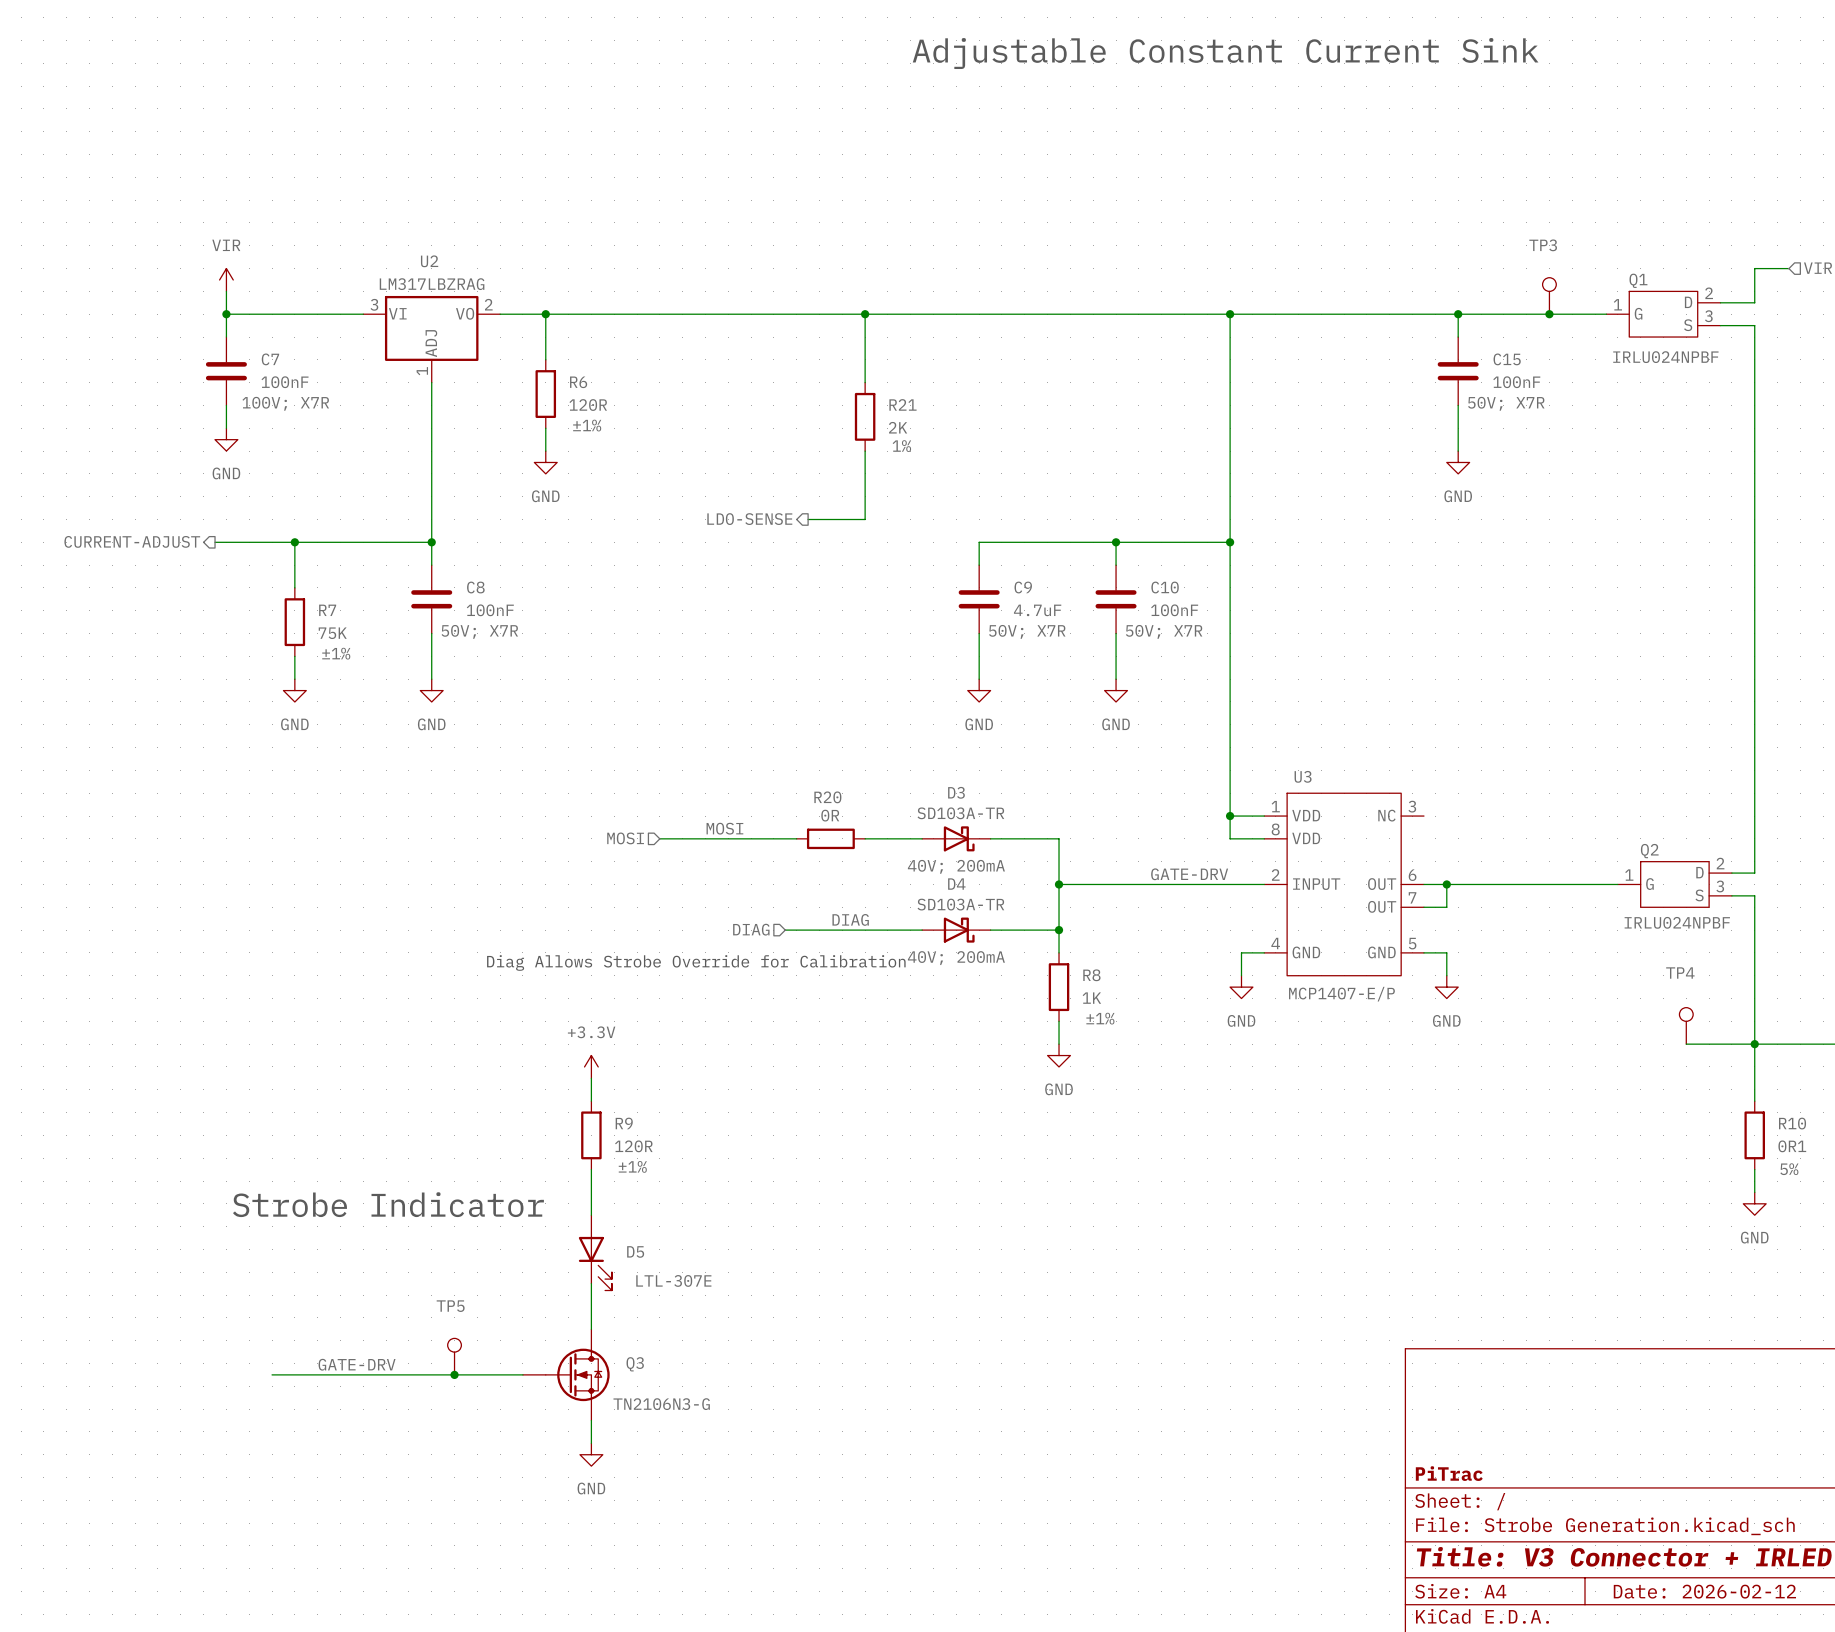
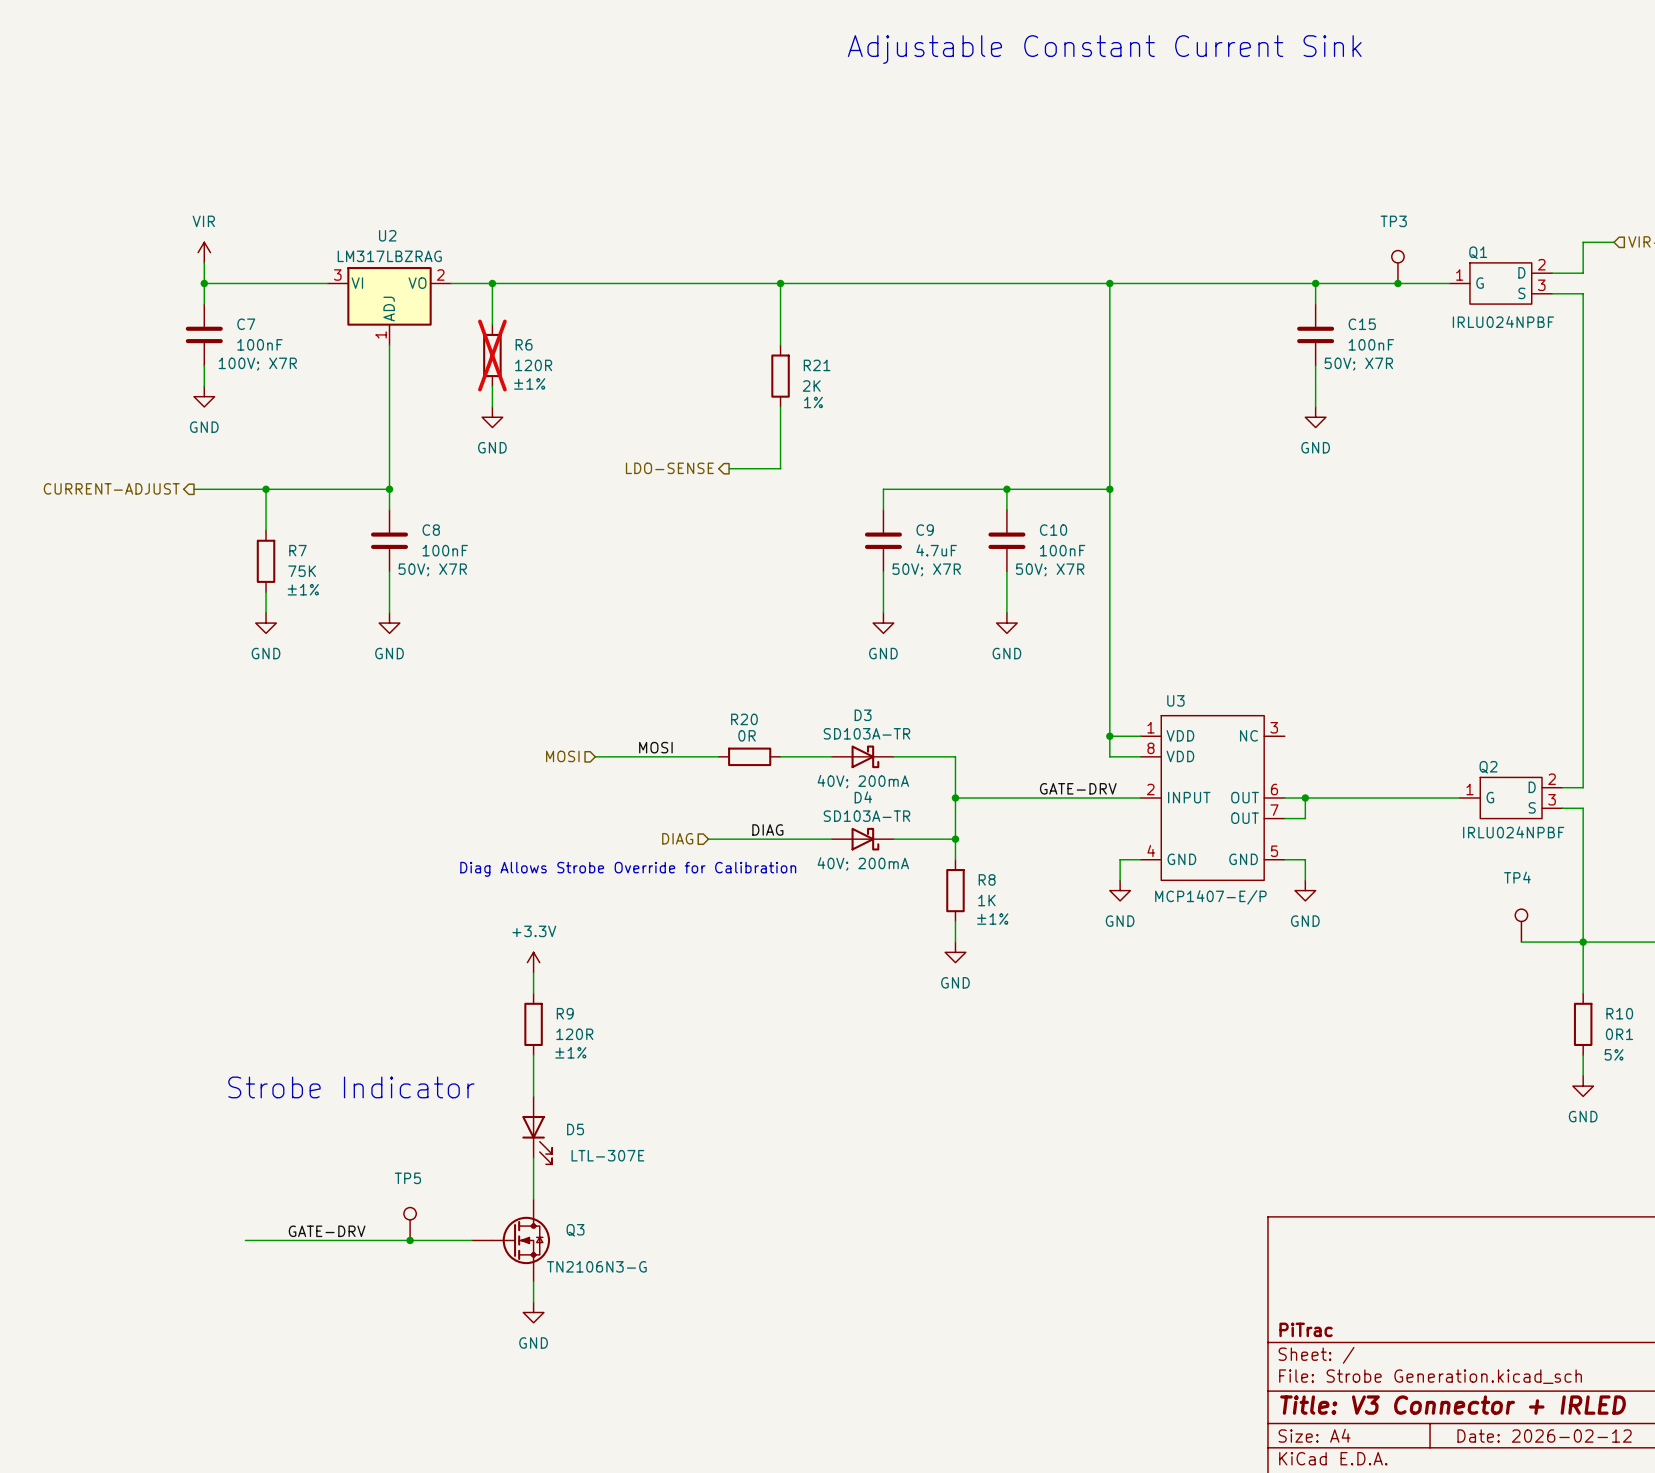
R6 do-not-place cross: none -> (492, 355)

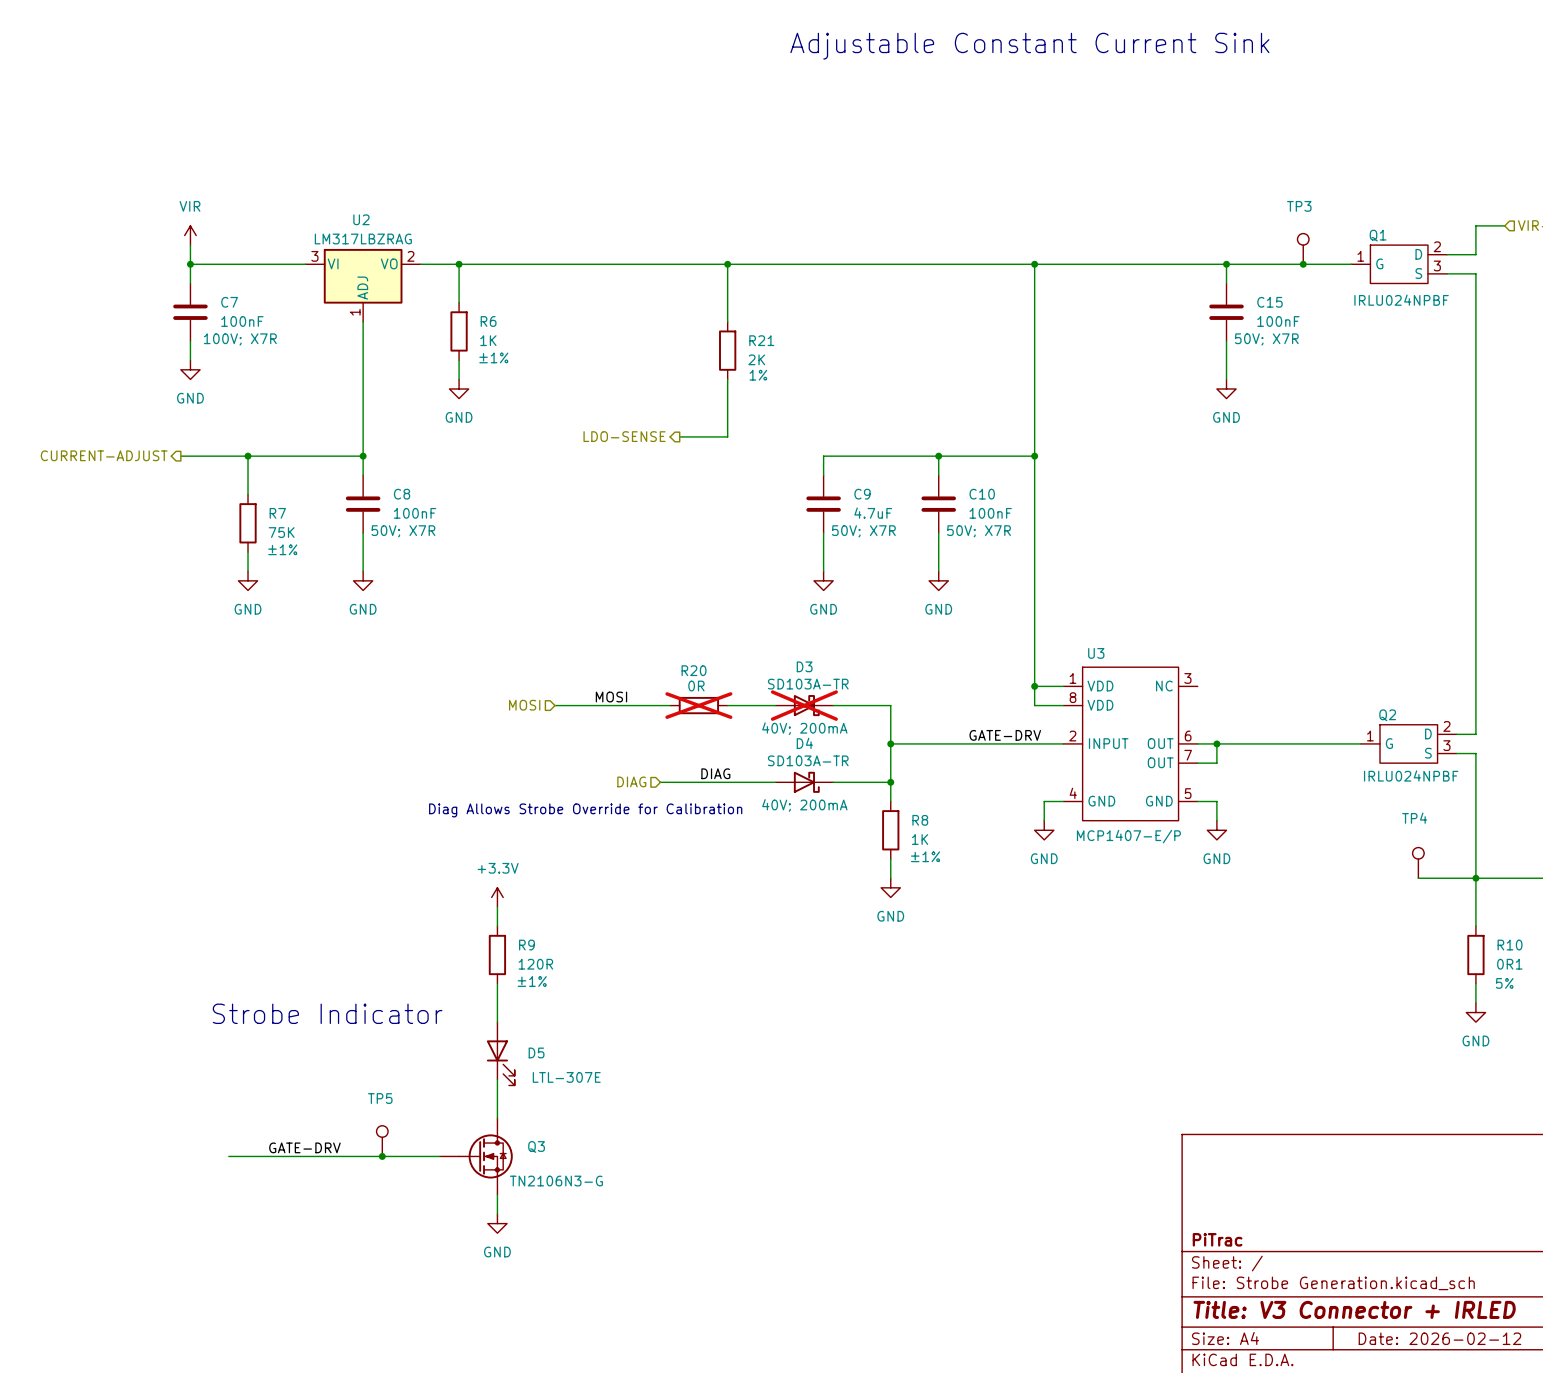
R6 do-not-place cross: (492, 355) -> none
R6 value: 120R (533, 365) -> 1K (488, 340)
R20 do-not-place cross: none -> (698, 705)
D3 do-not-place cross: none -> (804, 705)

